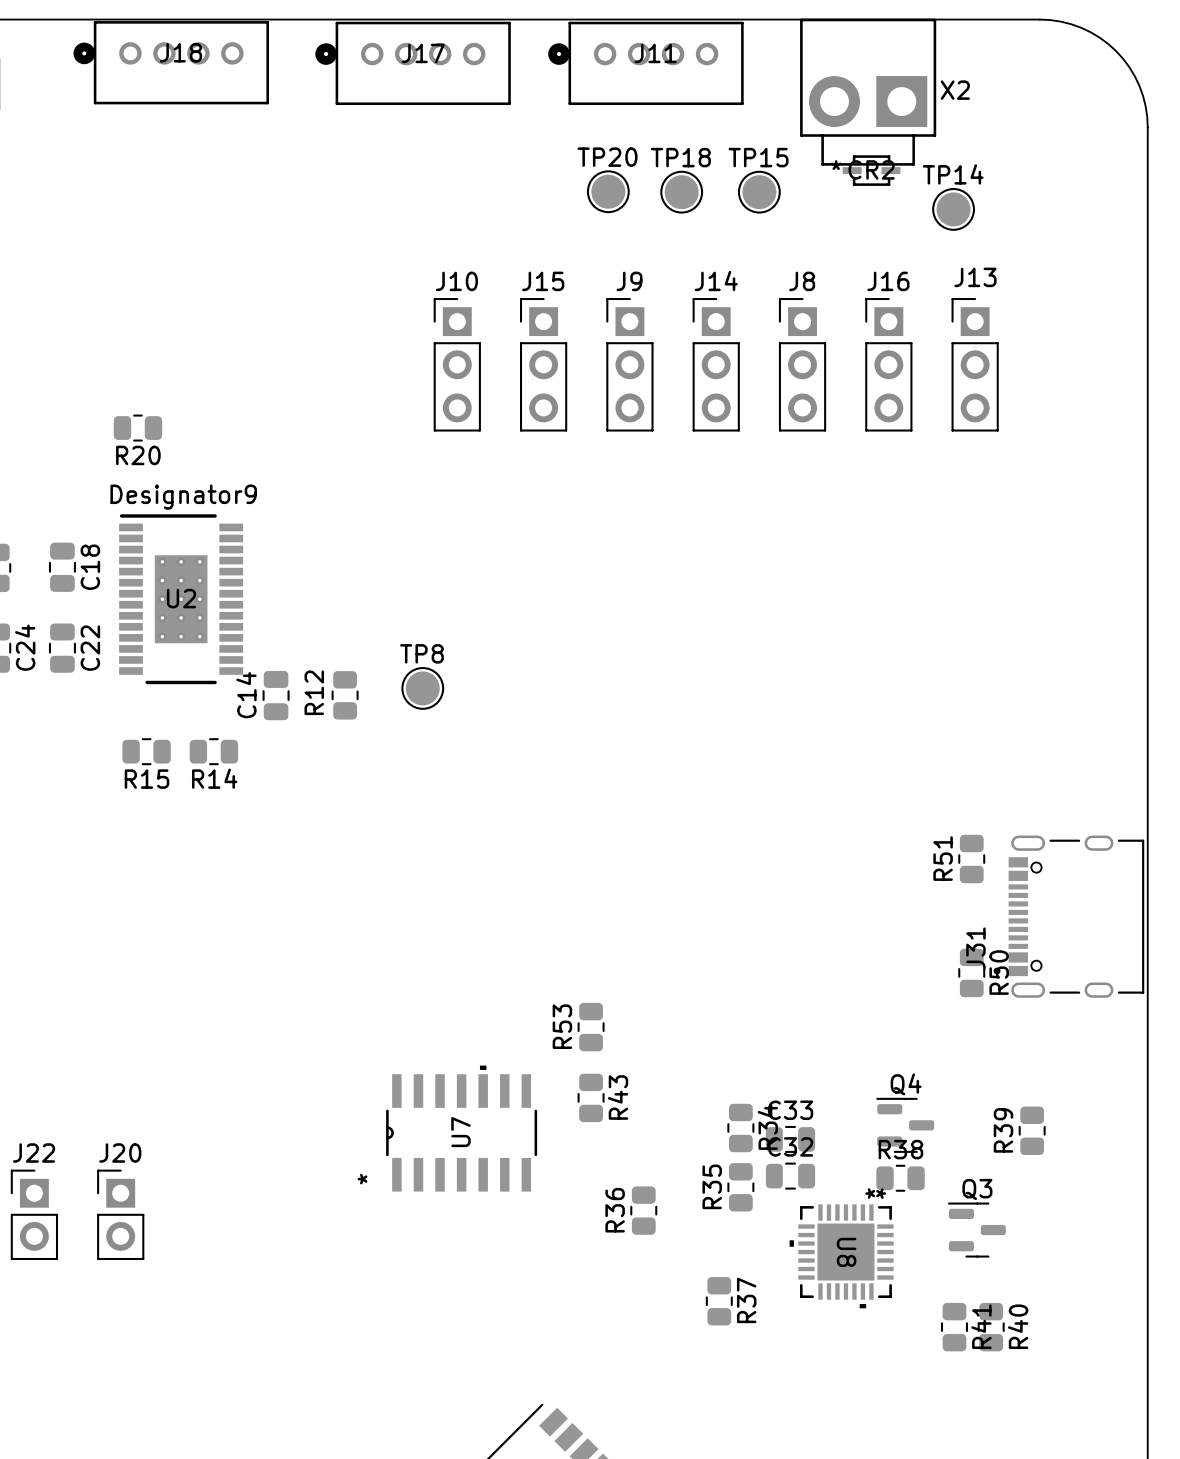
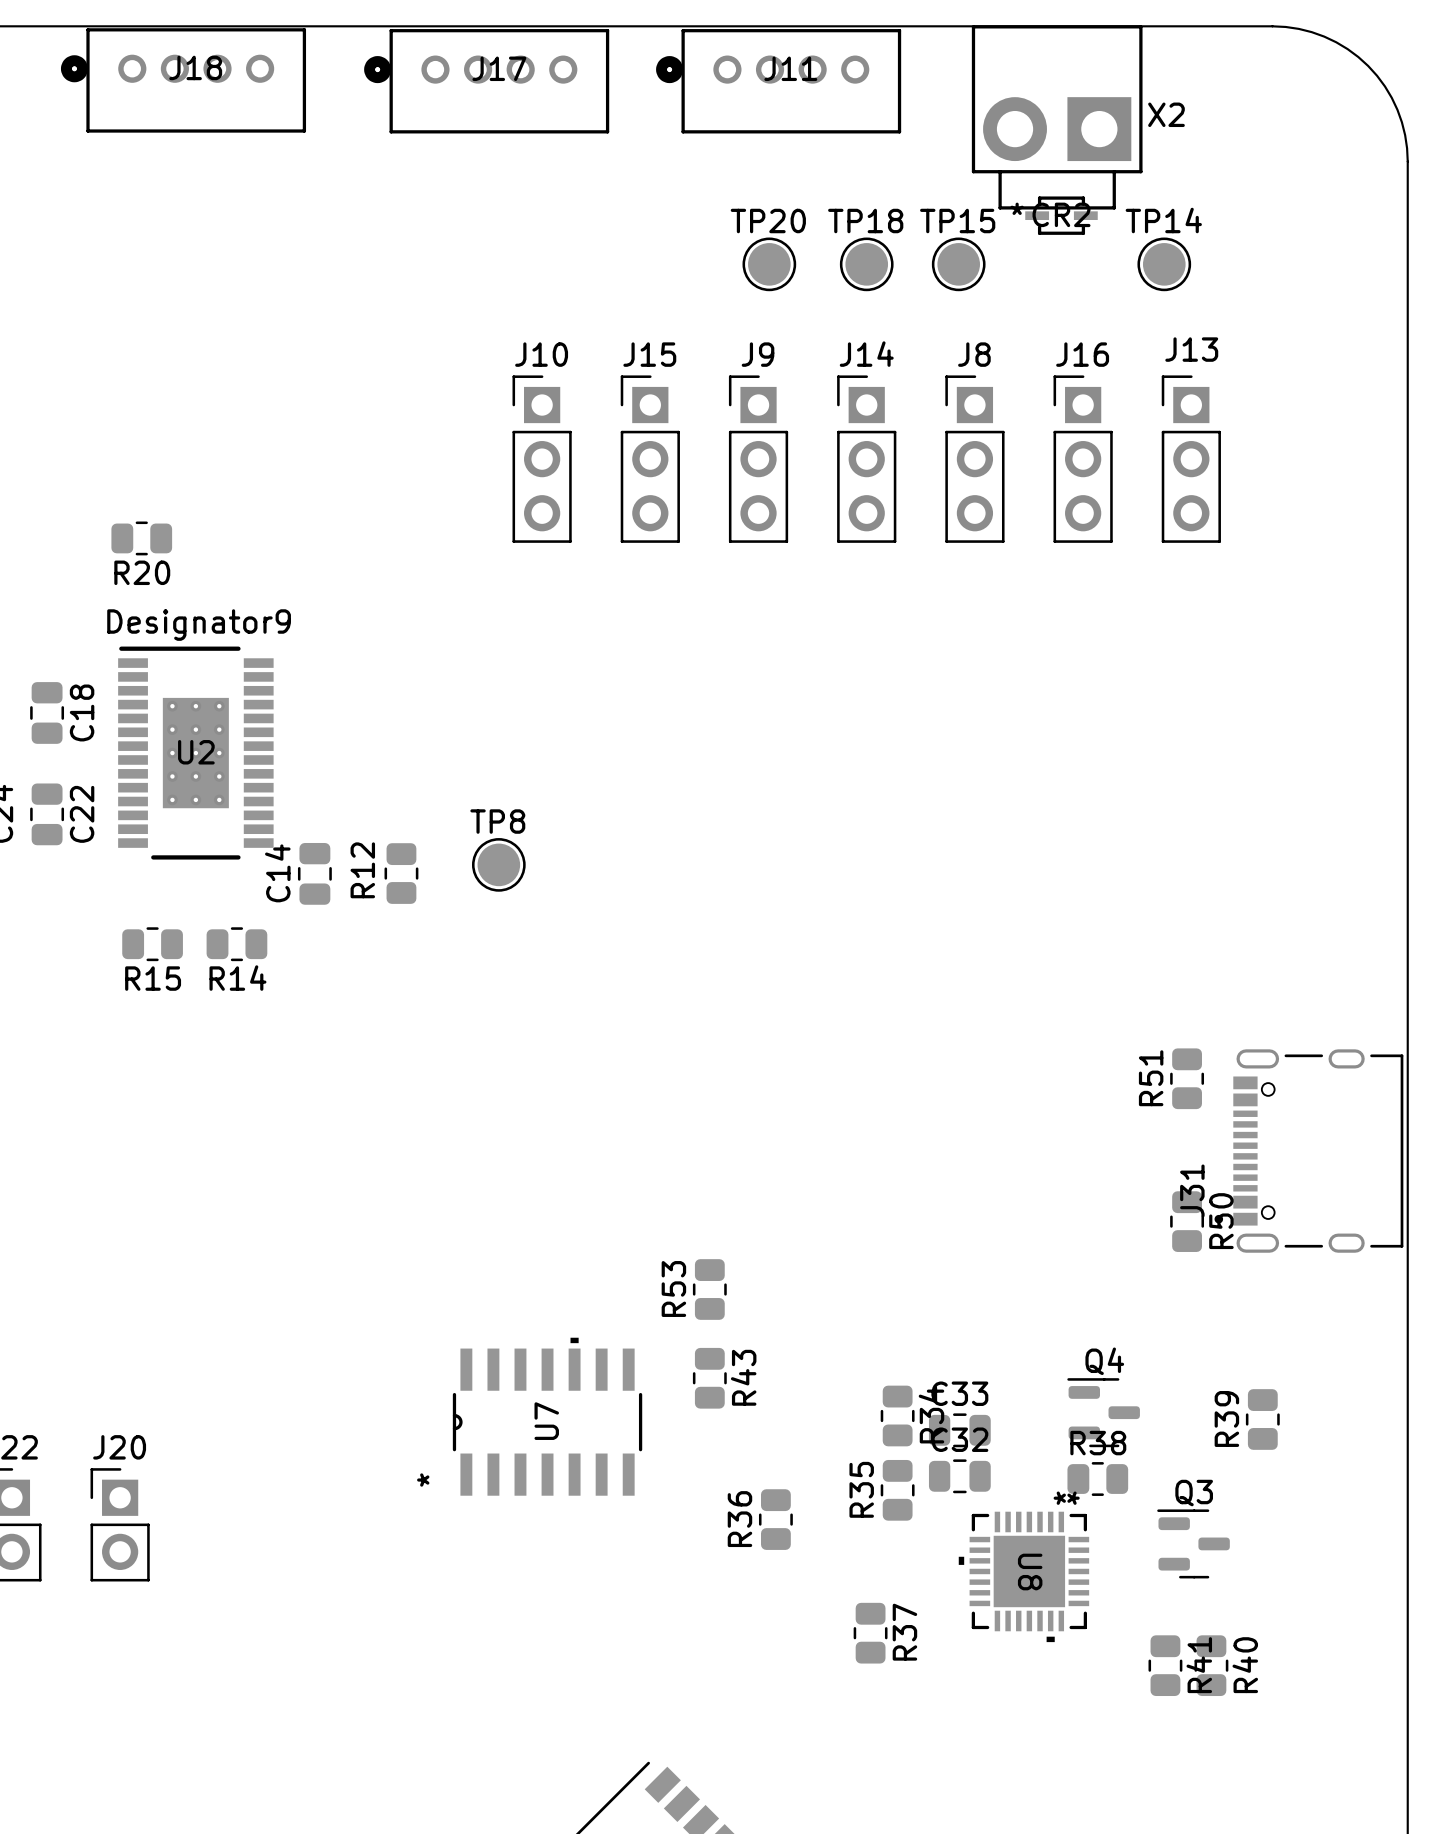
TP20 position: (608, 191) -> (769, 264)
TP18 position: (681, 192) -> (866, 264)
TP15 position: (759, 192) -> (958, 264)

